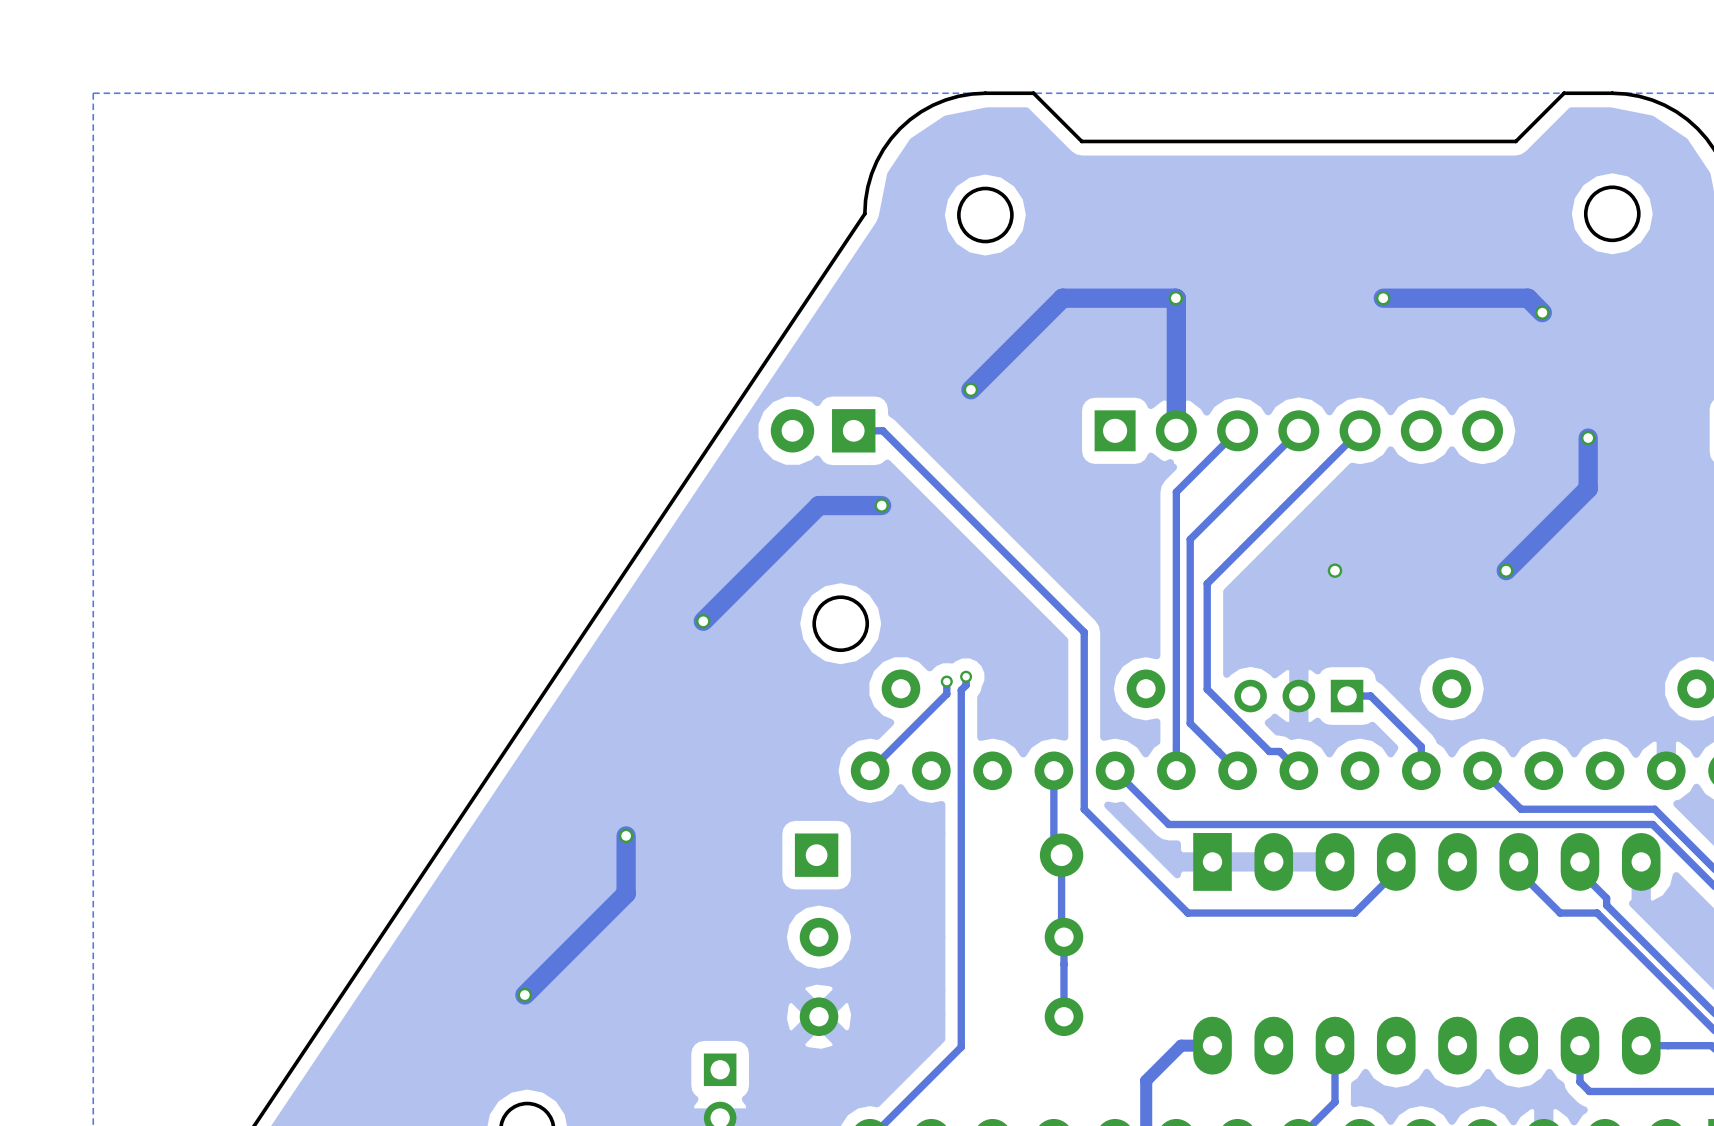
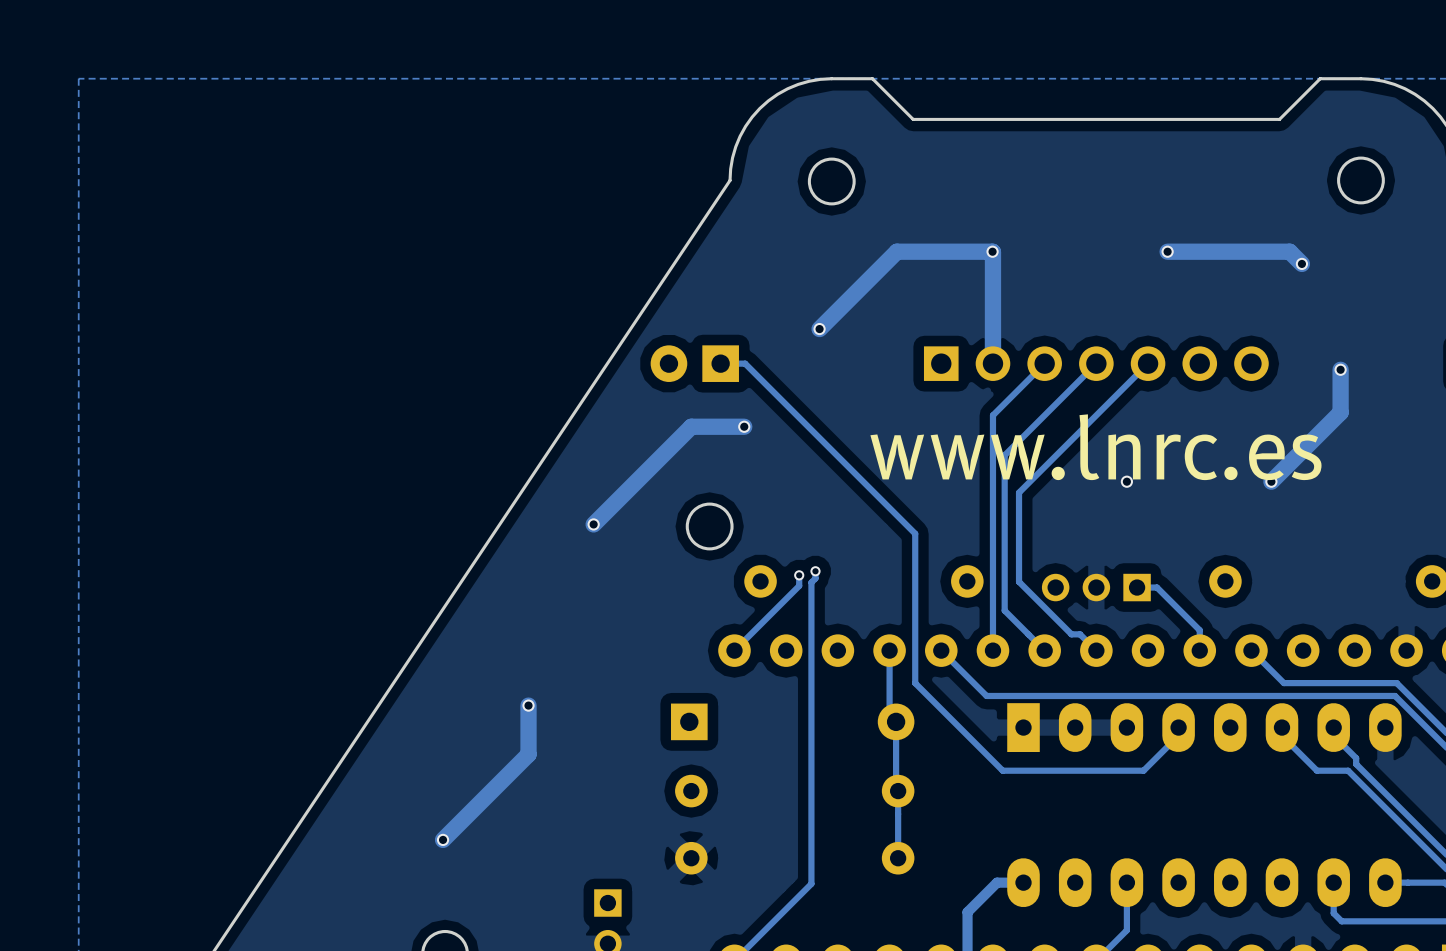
text: none -> www.lnrc.es (1095, 447)

